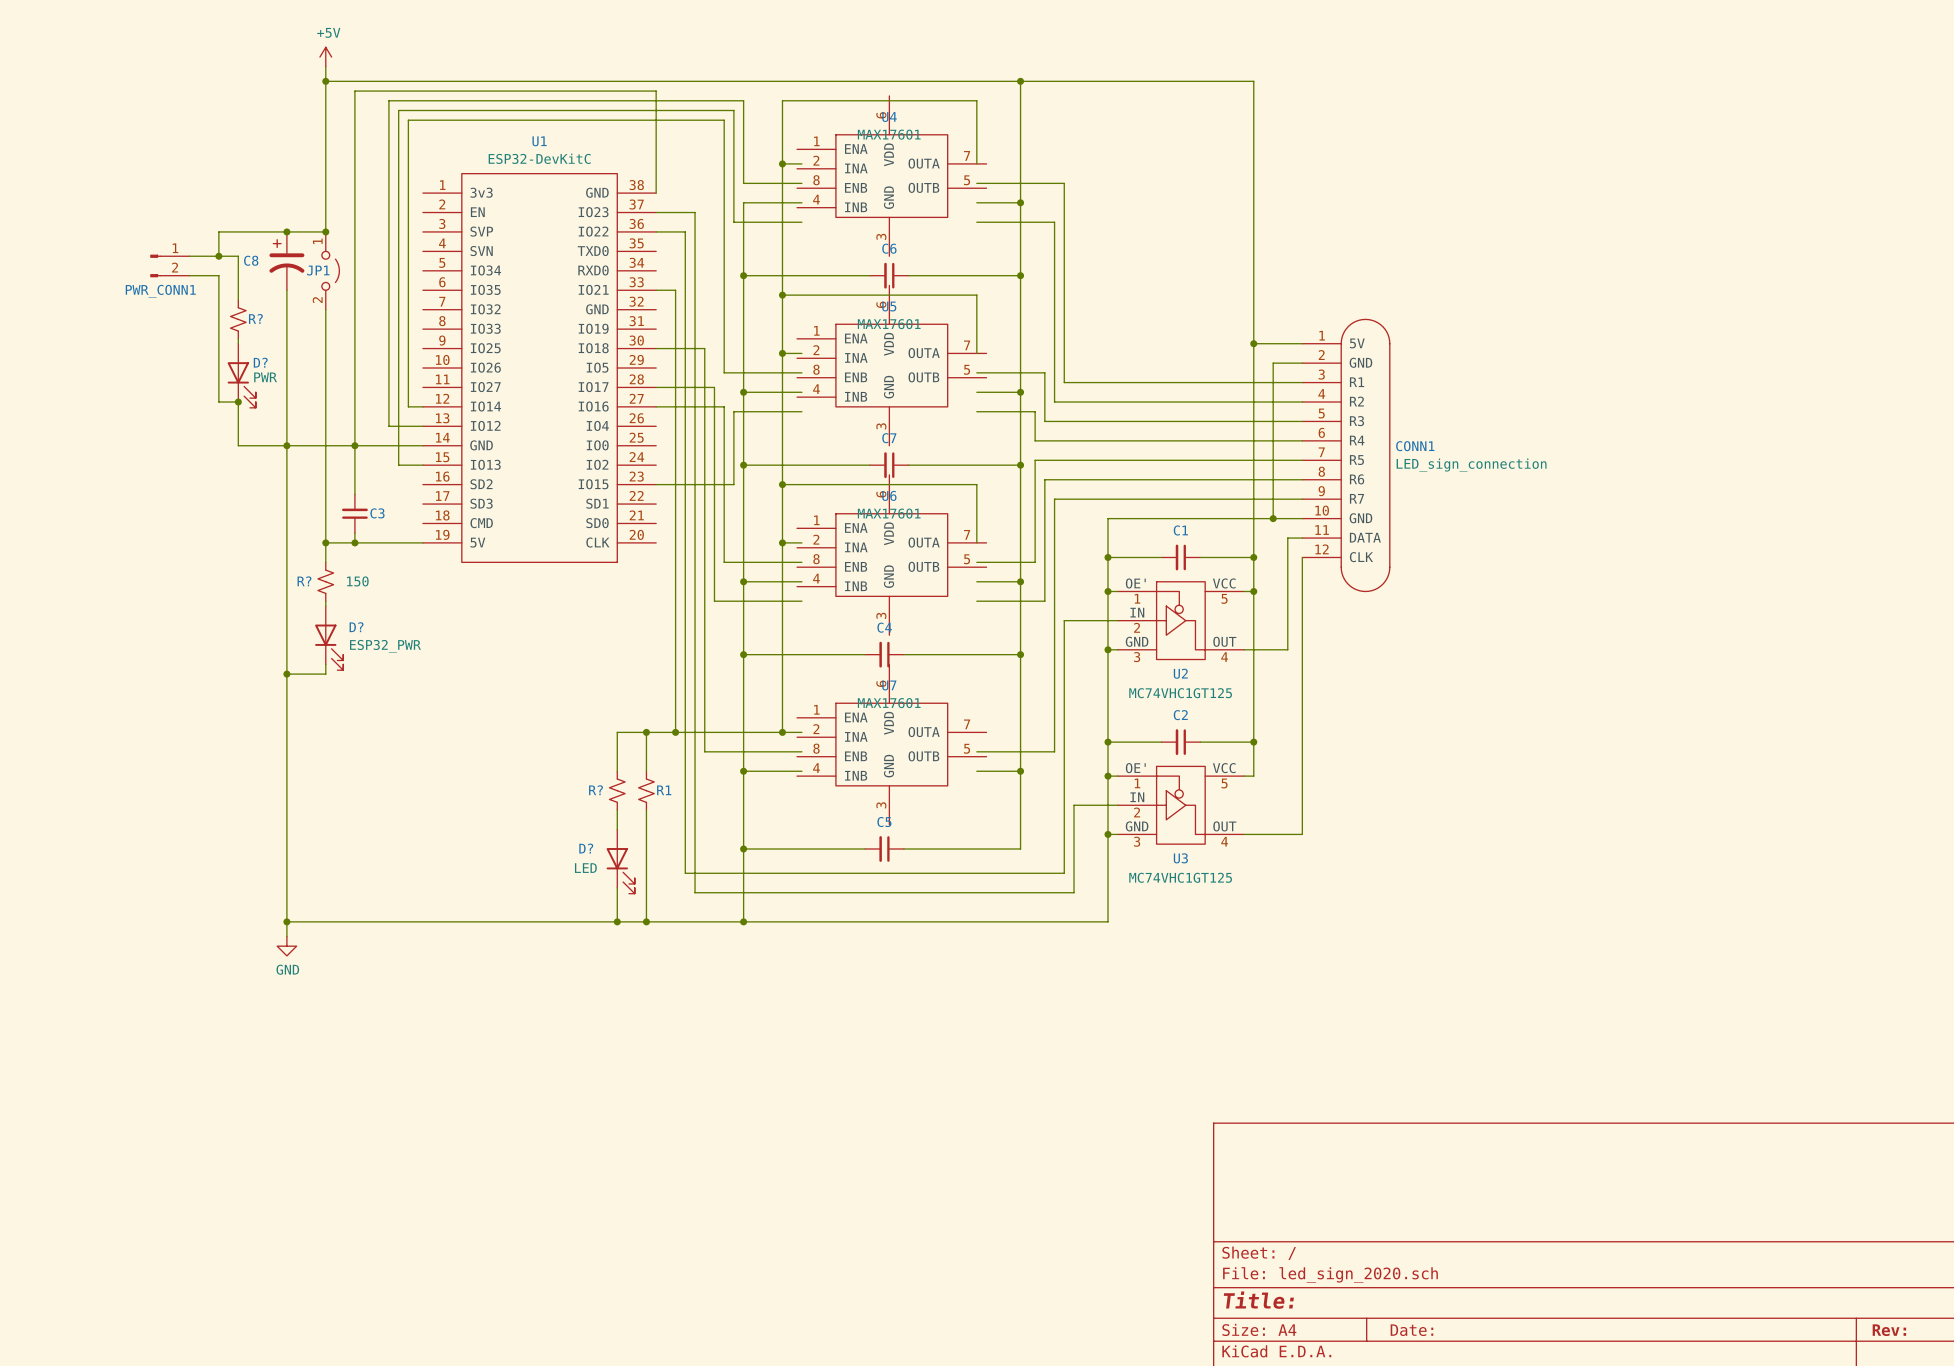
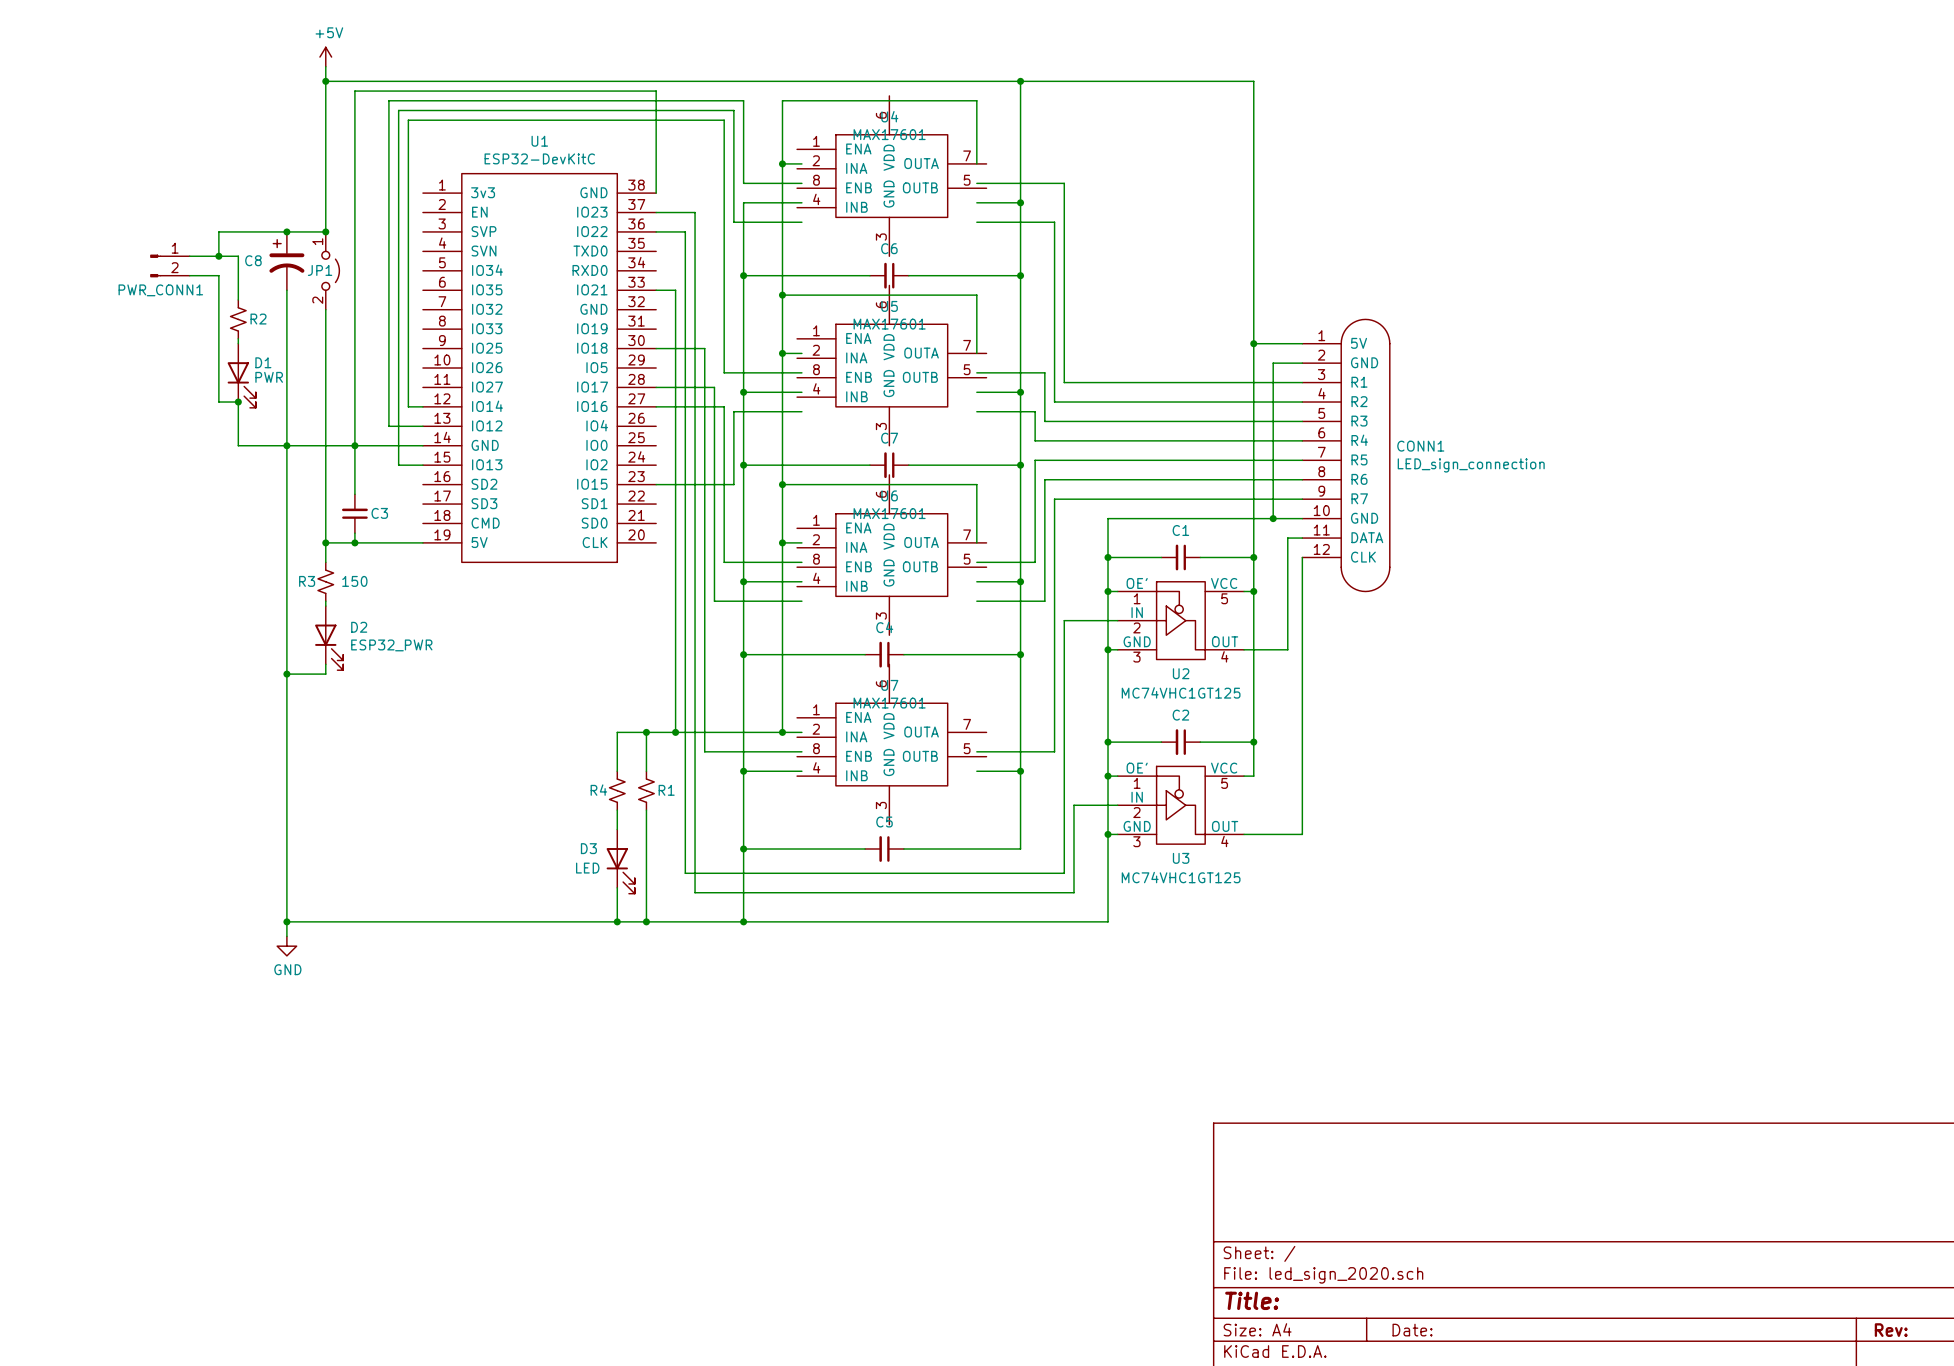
R? name: R? (255, 318) -> R2 (258, 319)
D? name: D? (260, 362) -> D1 (263, 362)
R? name: R? (304, 581) -> R3 (307, 581)
D? name: D? (356, 627) -> D2 (359, 627)
R? name: R? (596, 790) -> R4 (598, 790)
D? name: D? (586, 848) -> D3 (588, 848)

